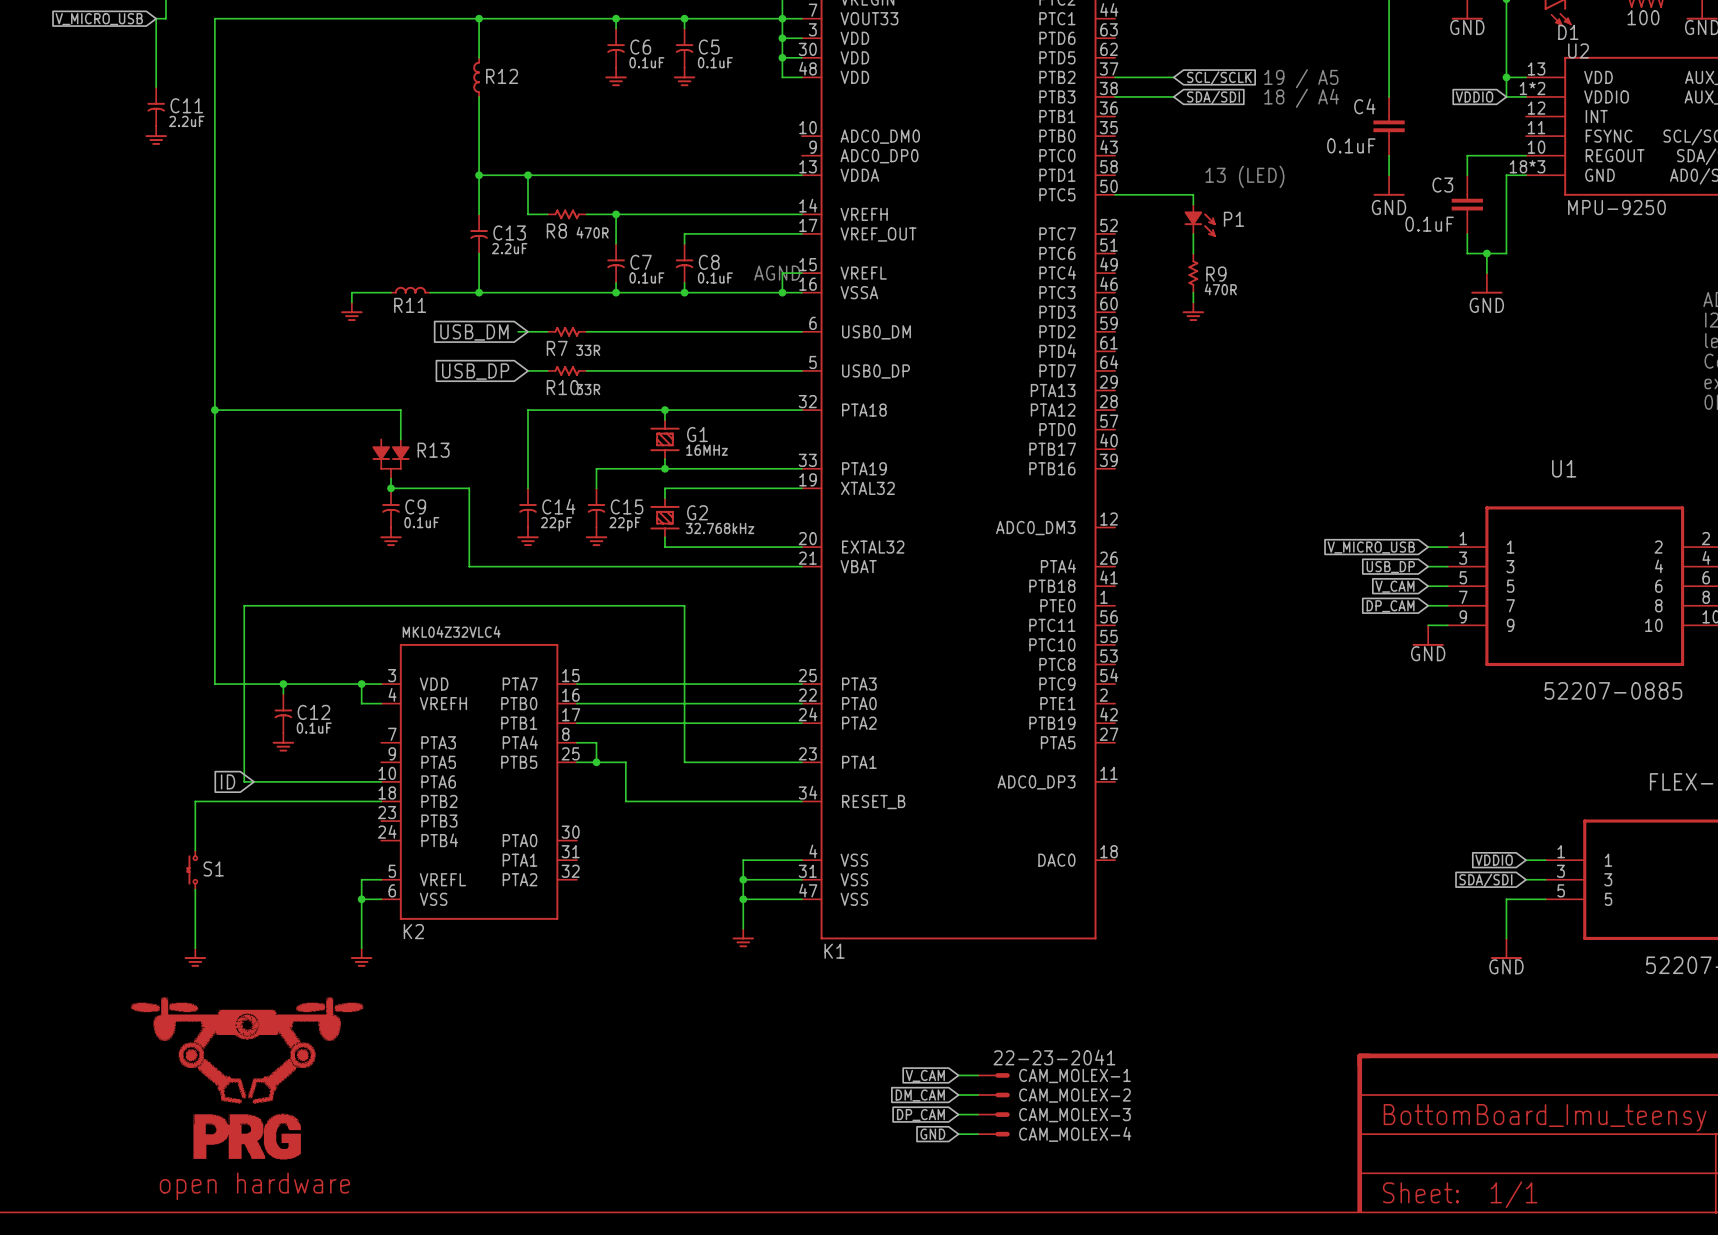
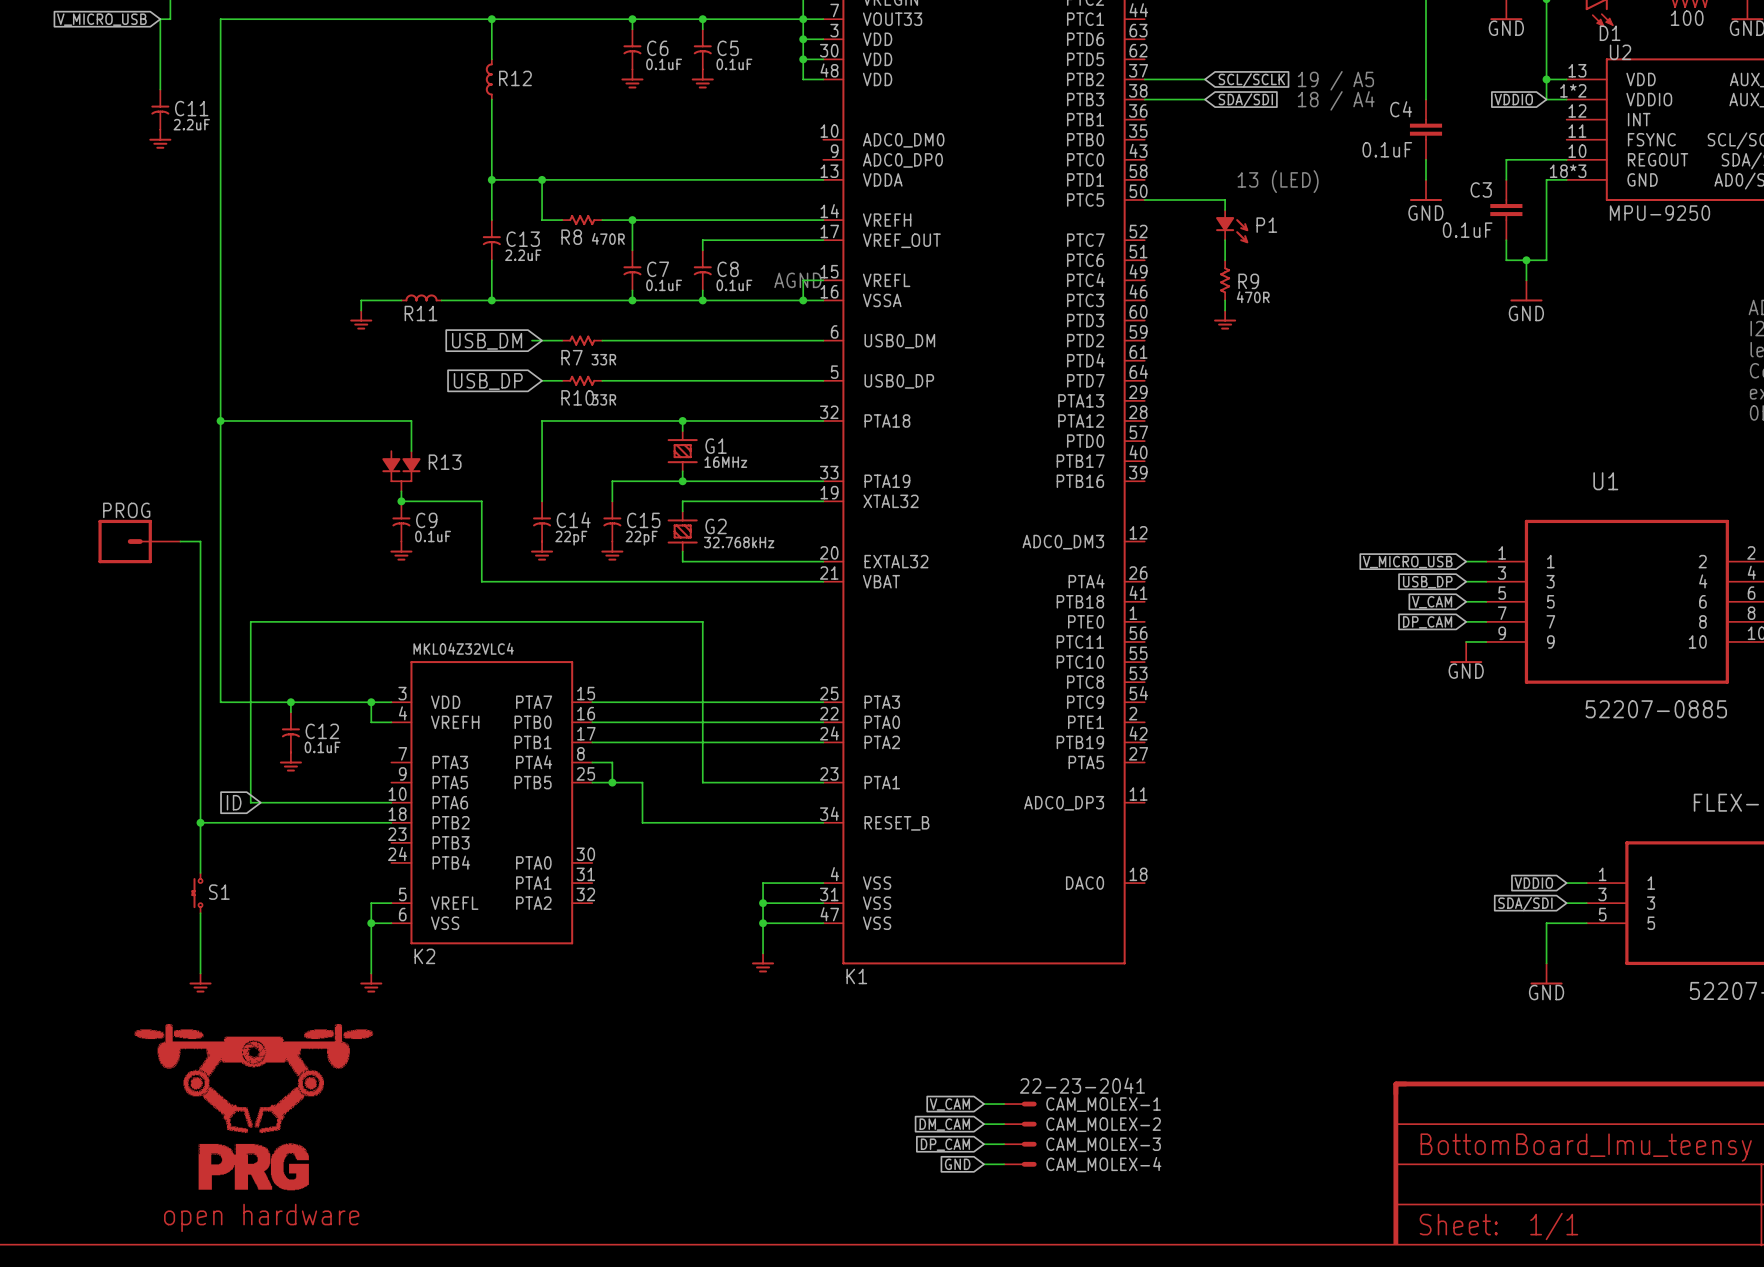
PROG: none -> (139, 541)
wire: none -> (180, 541) (200, 541) (200, 822)
junction: none -> (200, 822)

